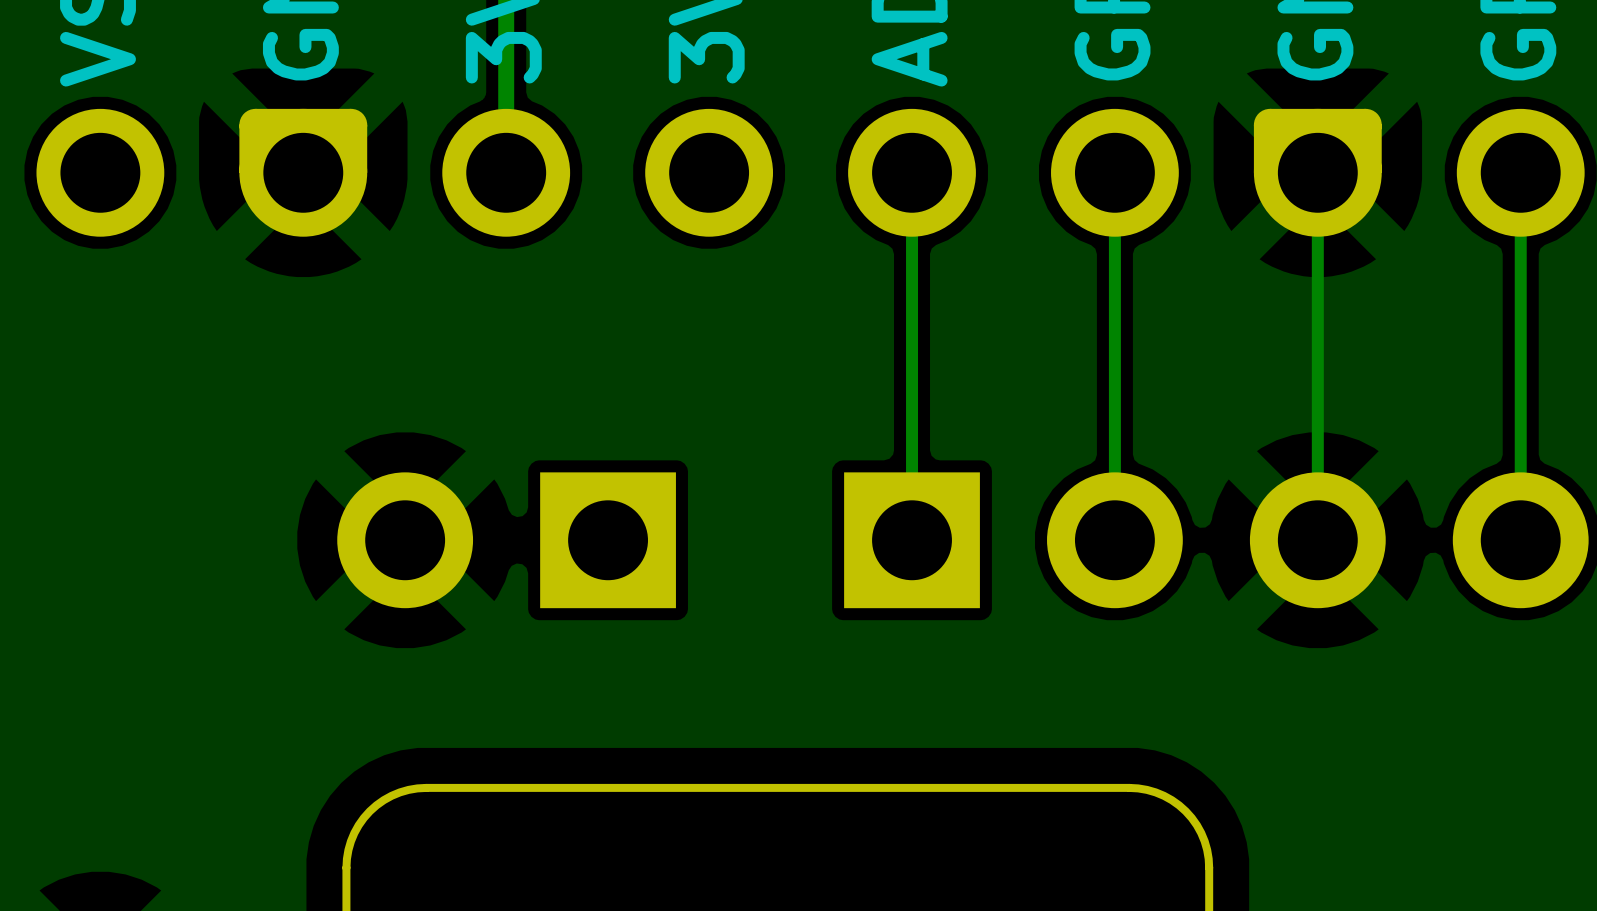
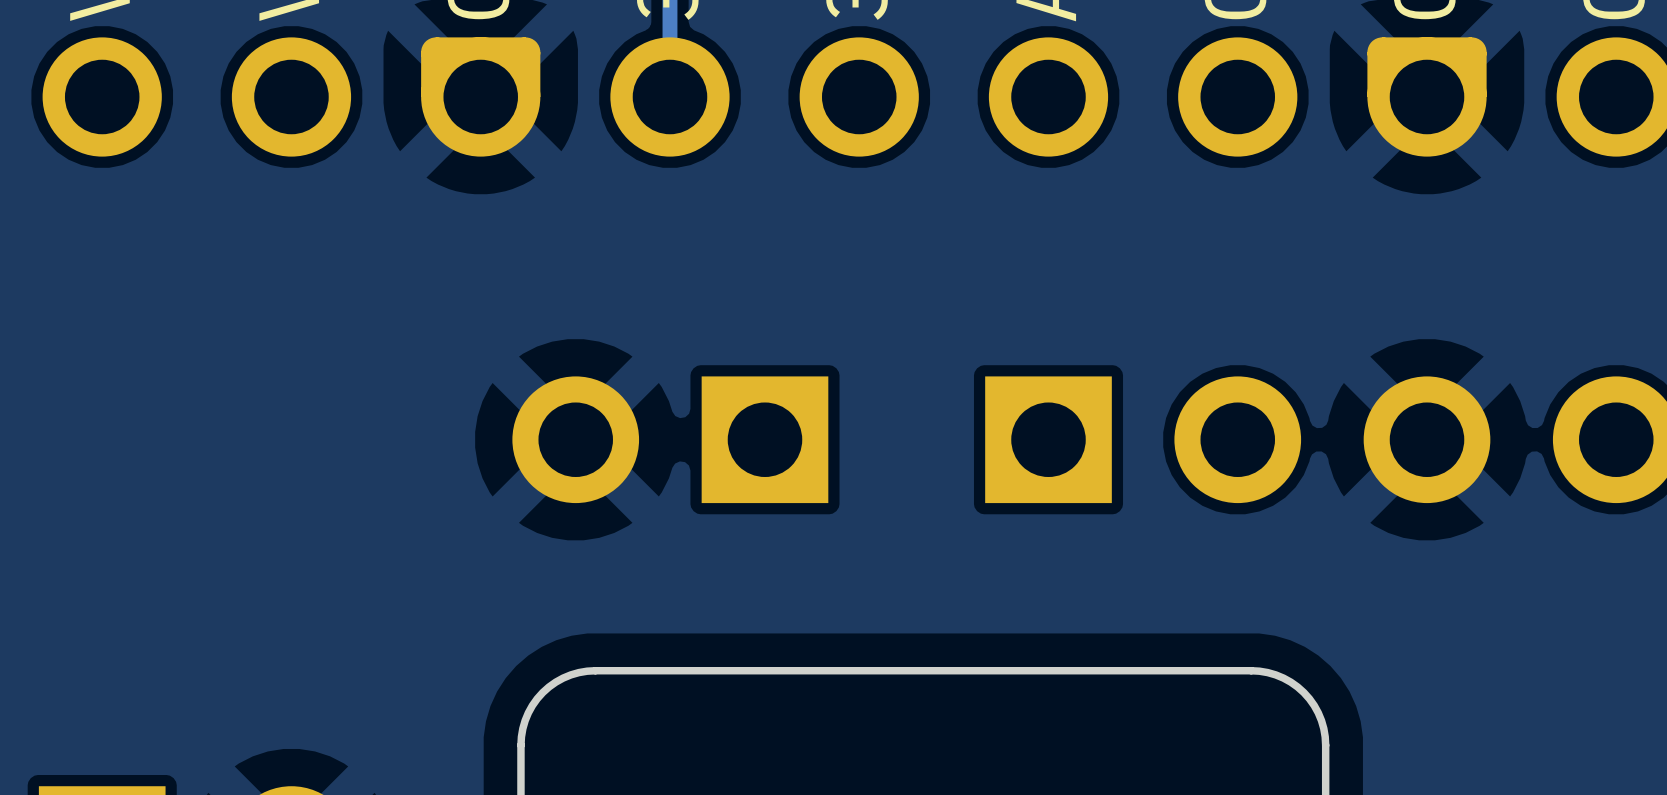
track: (912, 172) (912, 540) -> none
track: (1114, 172) (1114, 540) -> none
track: (1317, 172) (1317, 540) -> none
track: (1520, 172) (1520, 540) -> none

